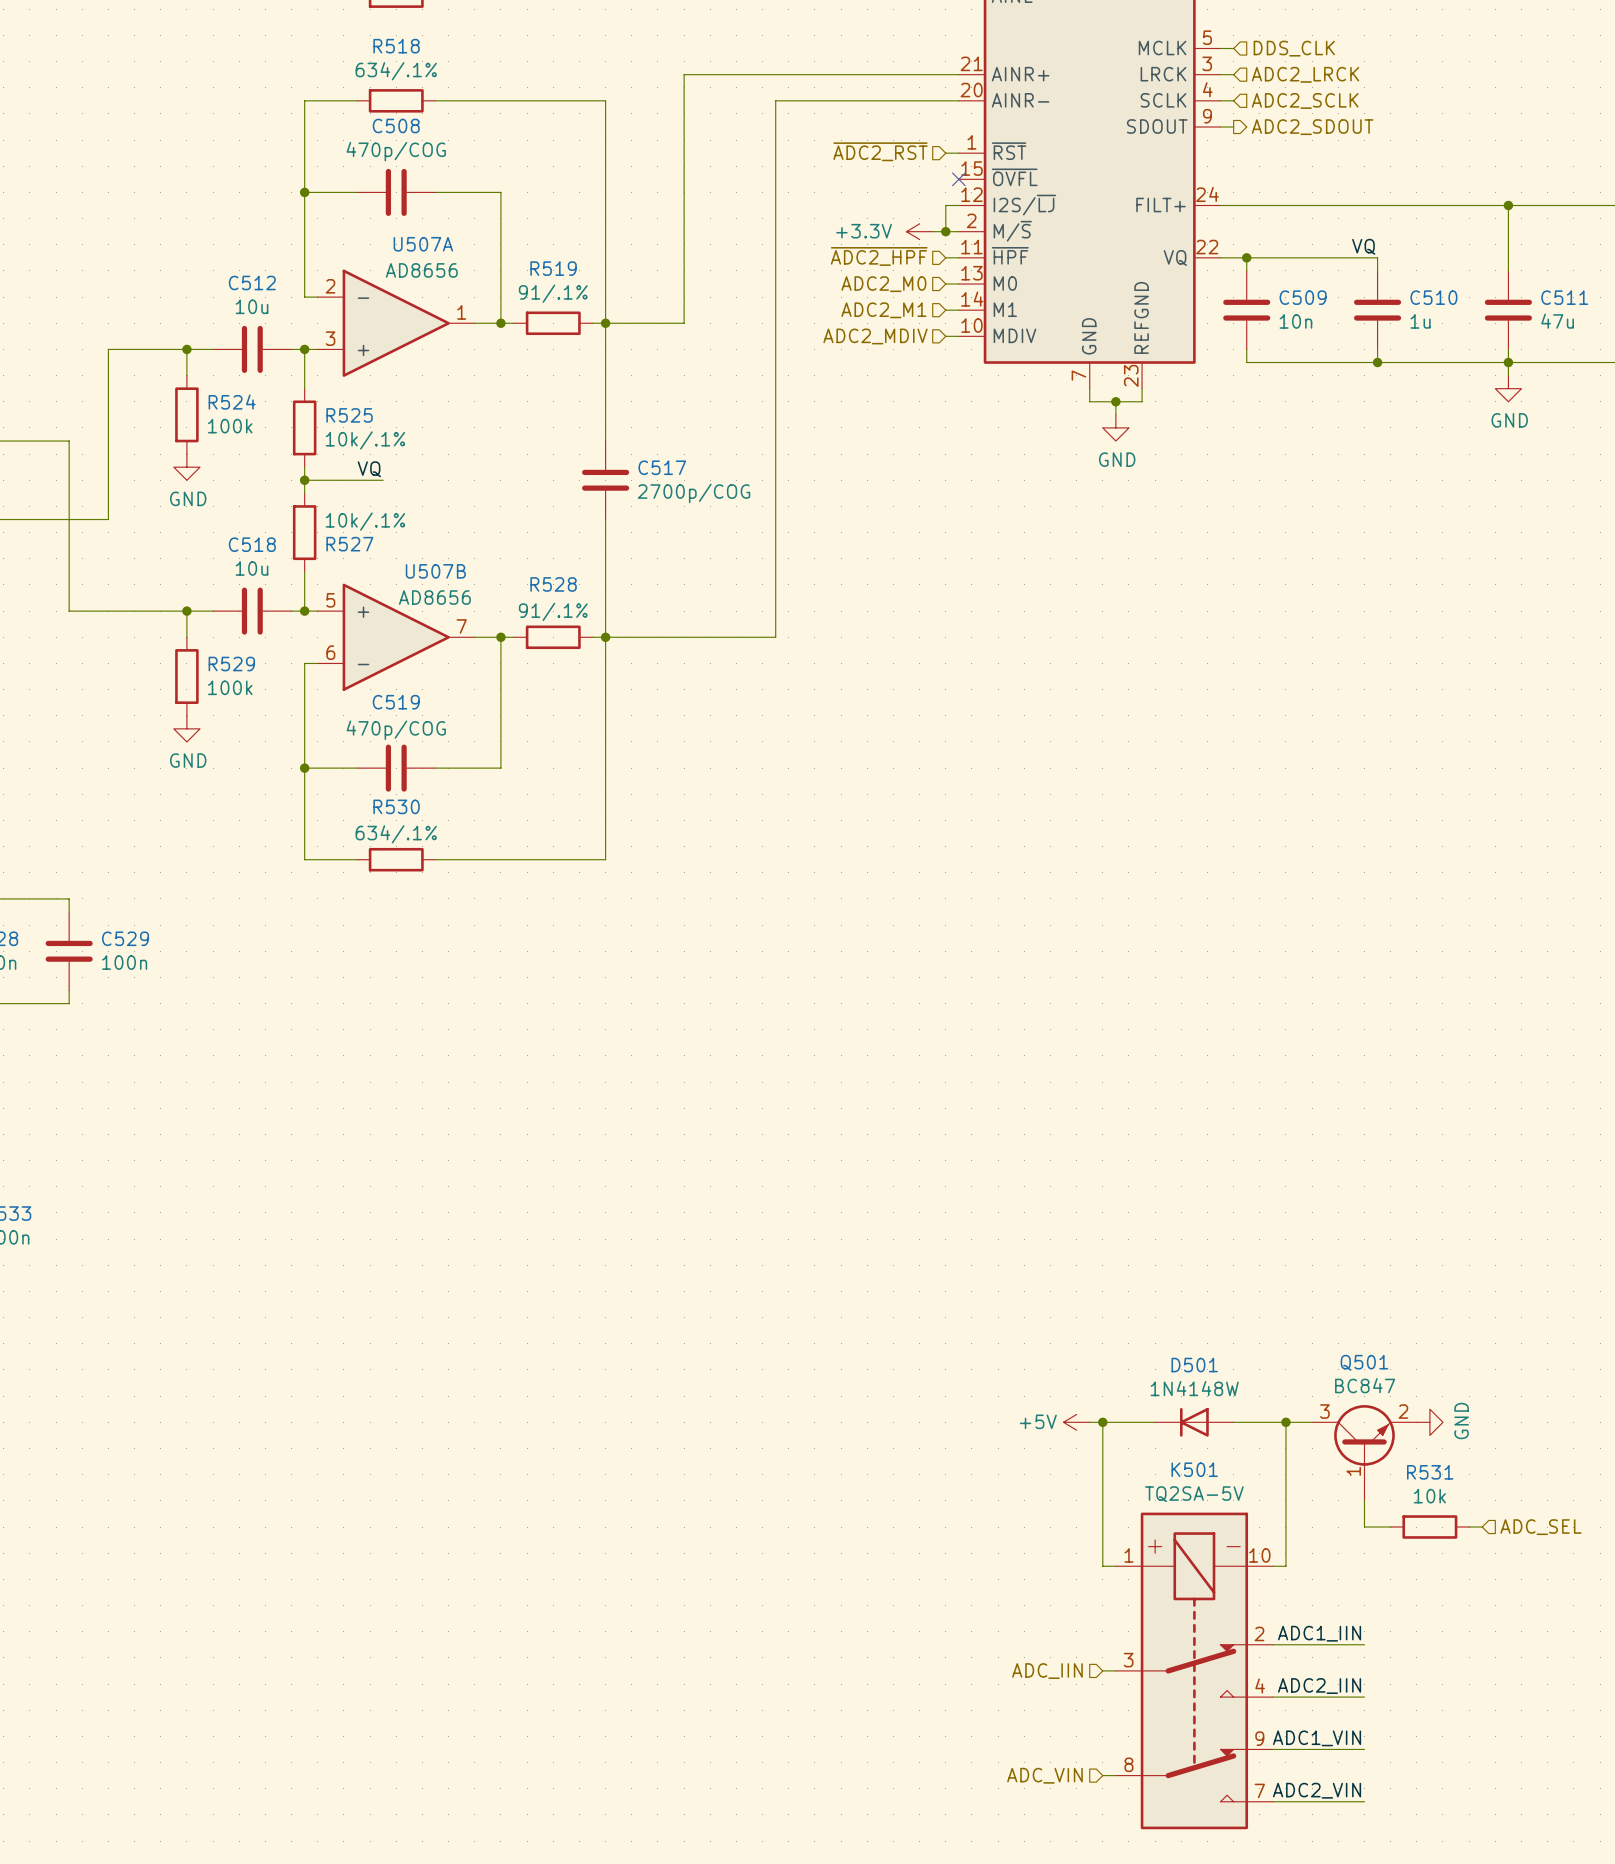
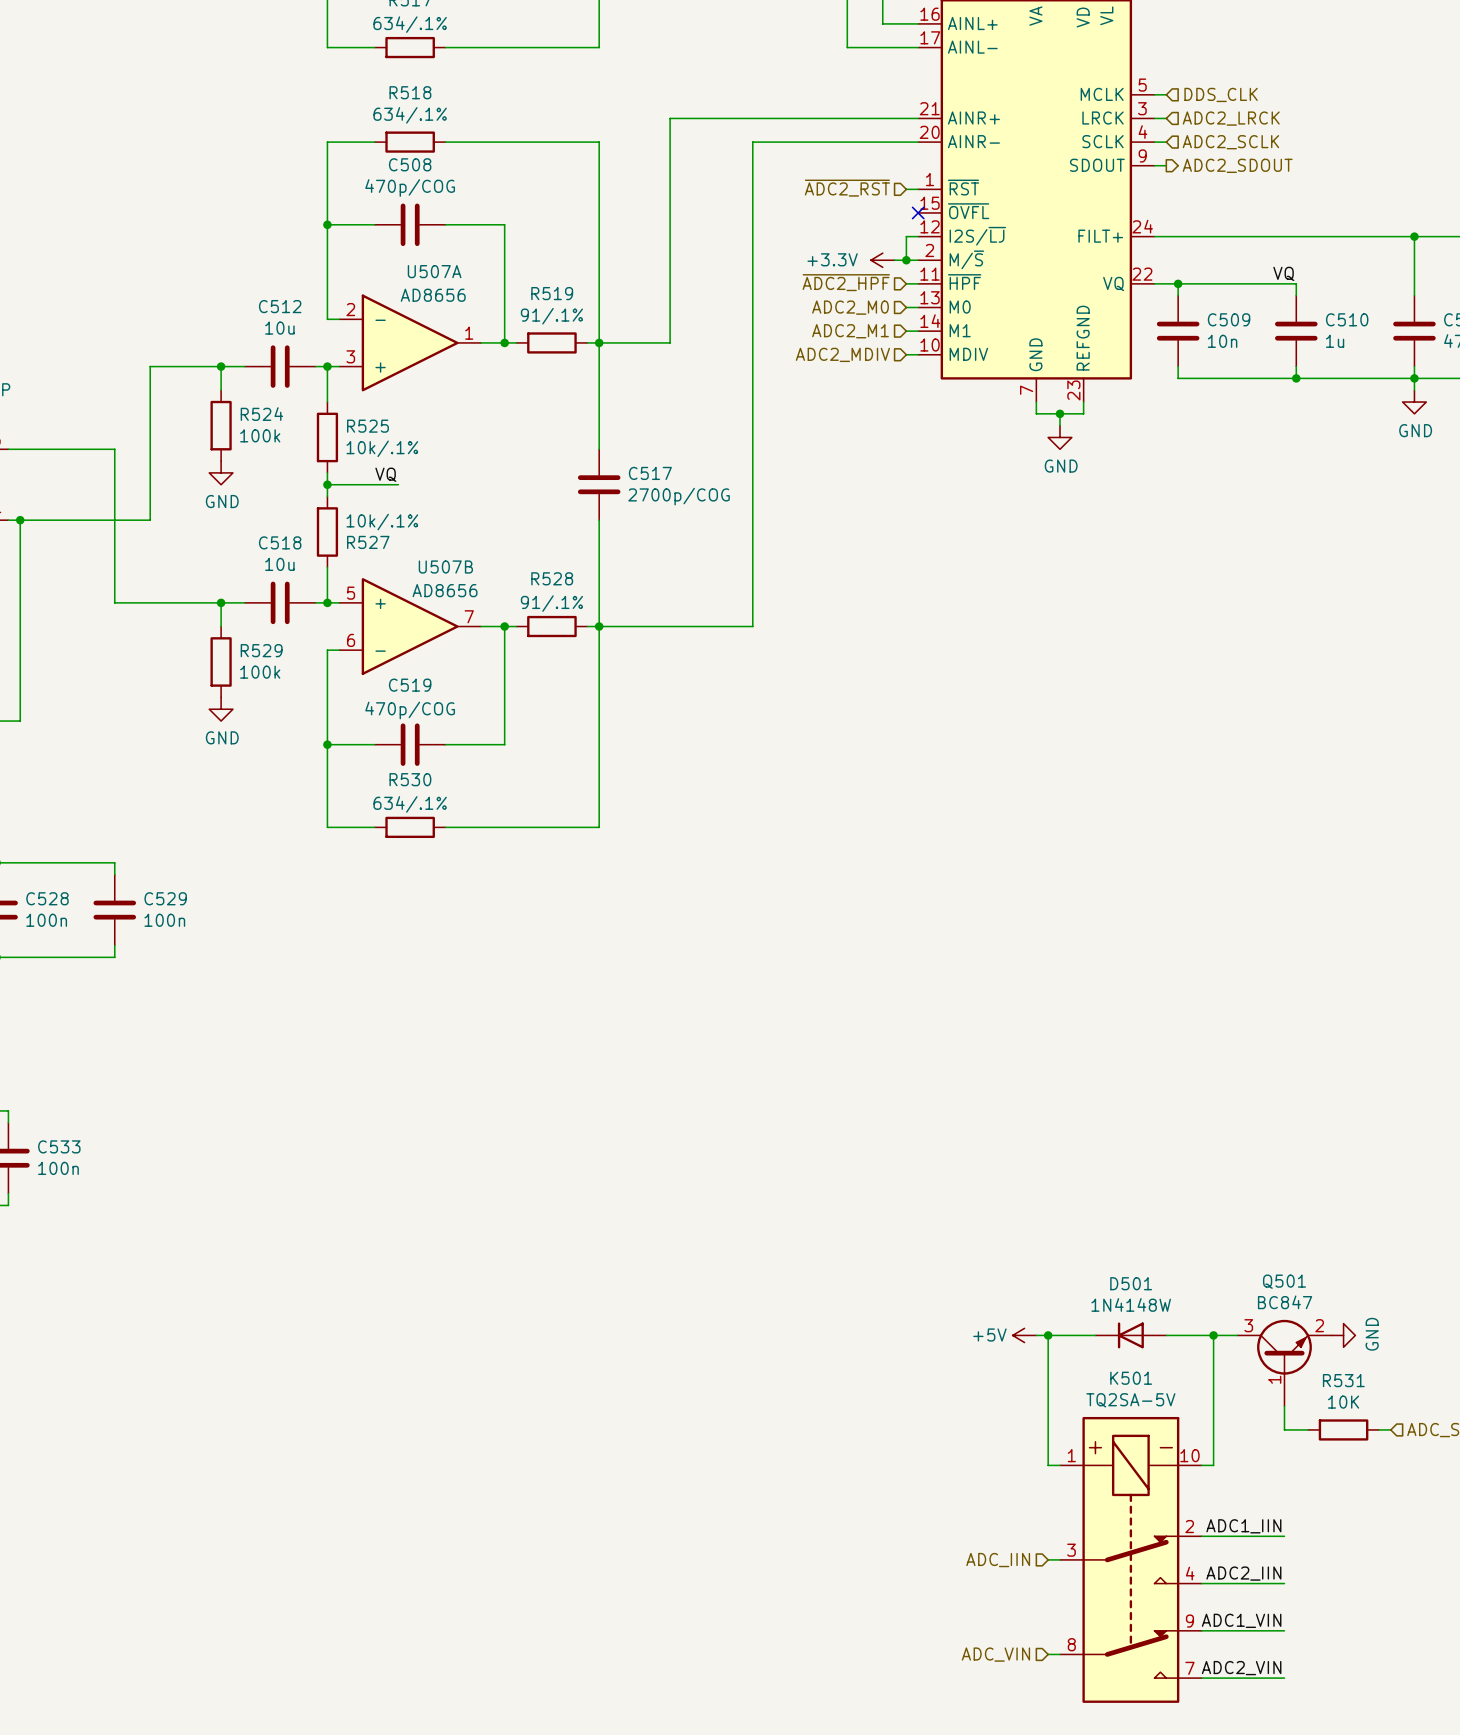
R531 value: 10k (1429, 1496) -> 10K (1343, 1402)

